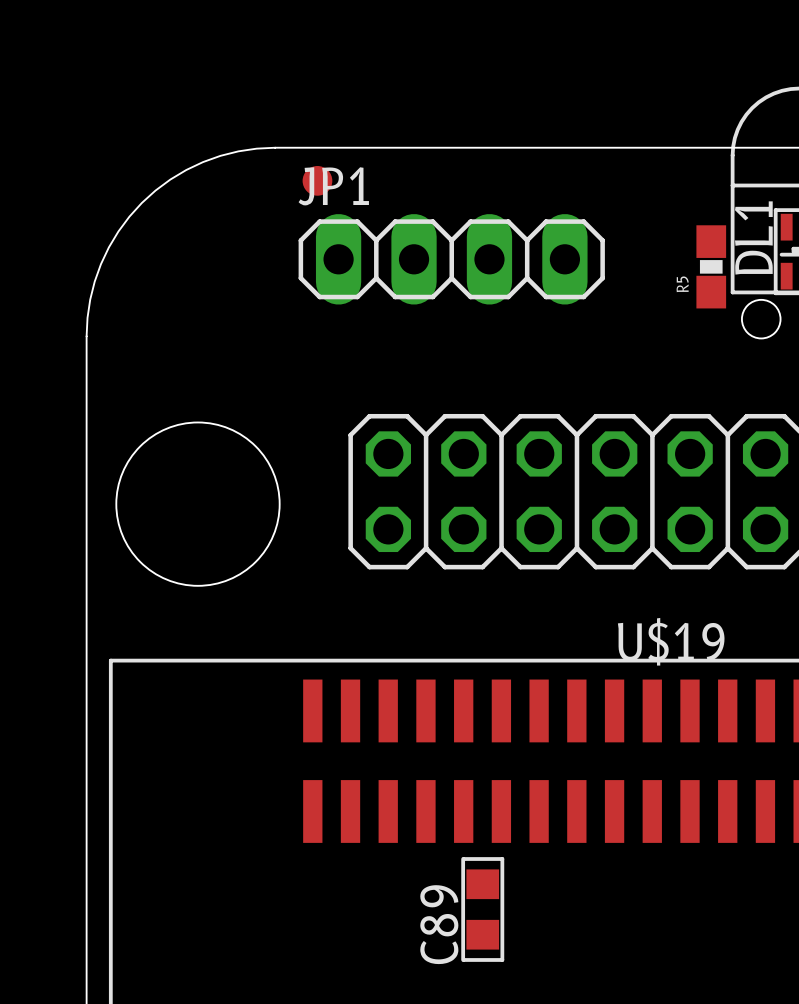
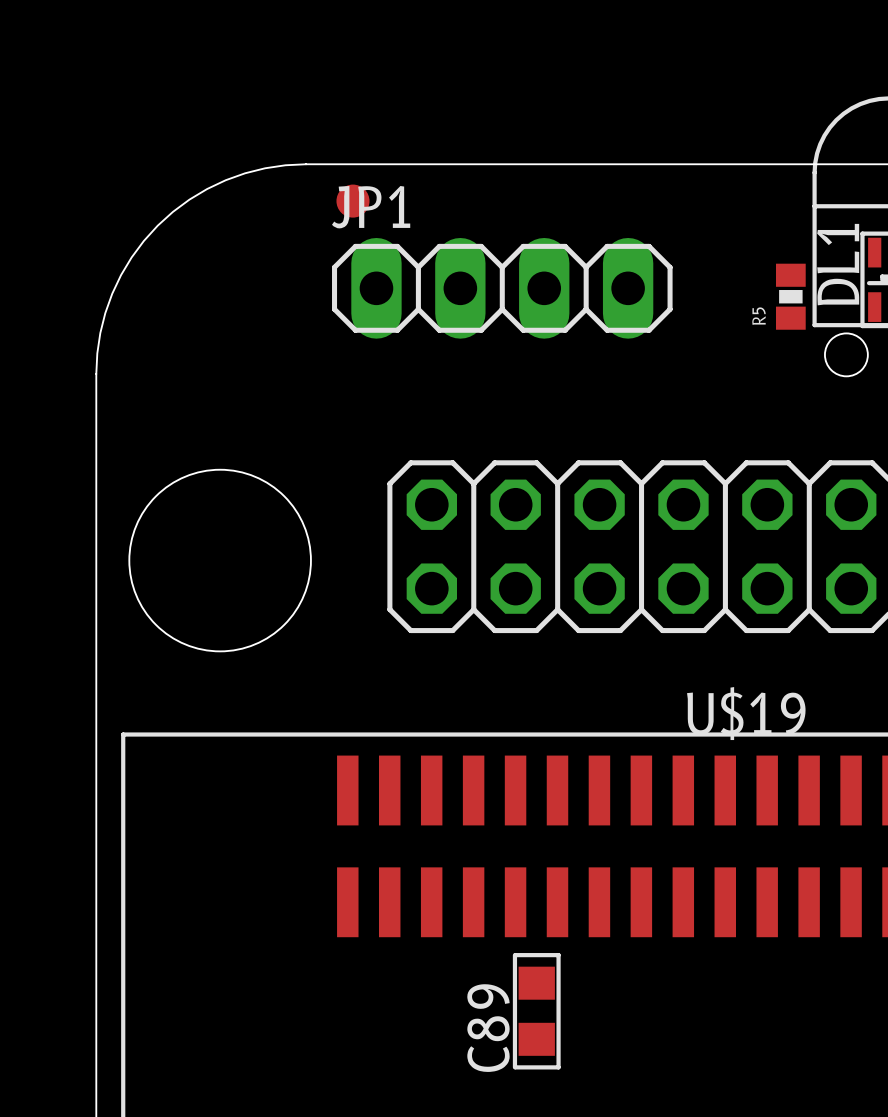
R5 footprint: [696, 225, 727, 309] -> [775, 263, 806, 330]

